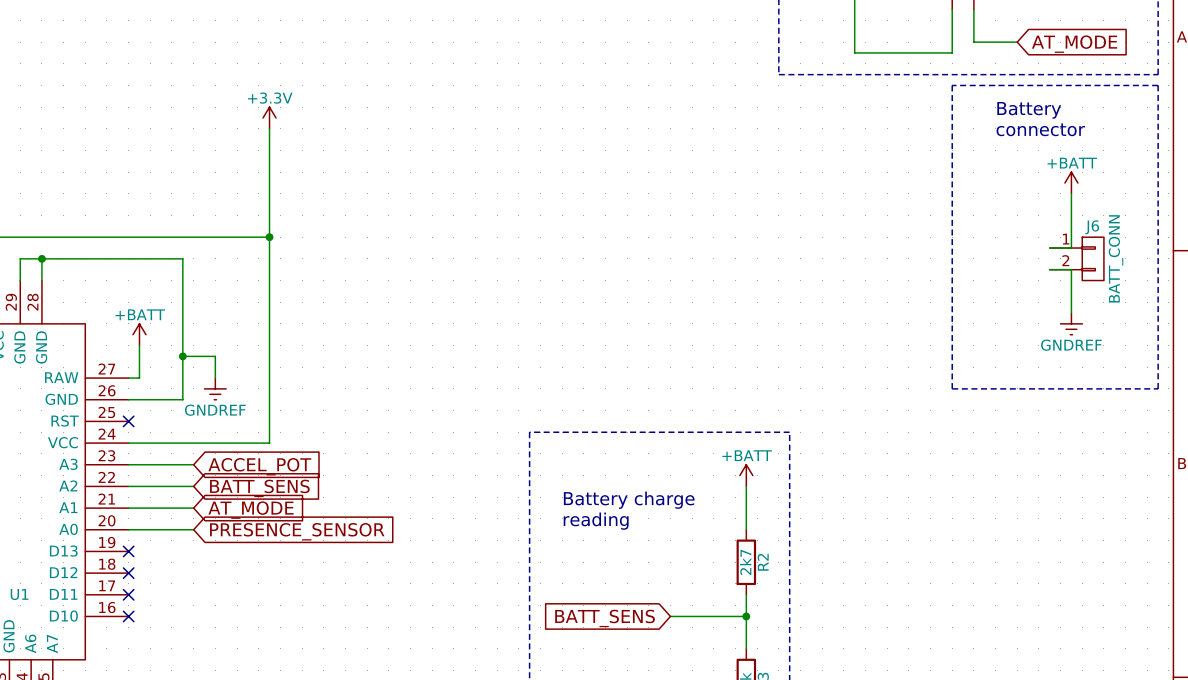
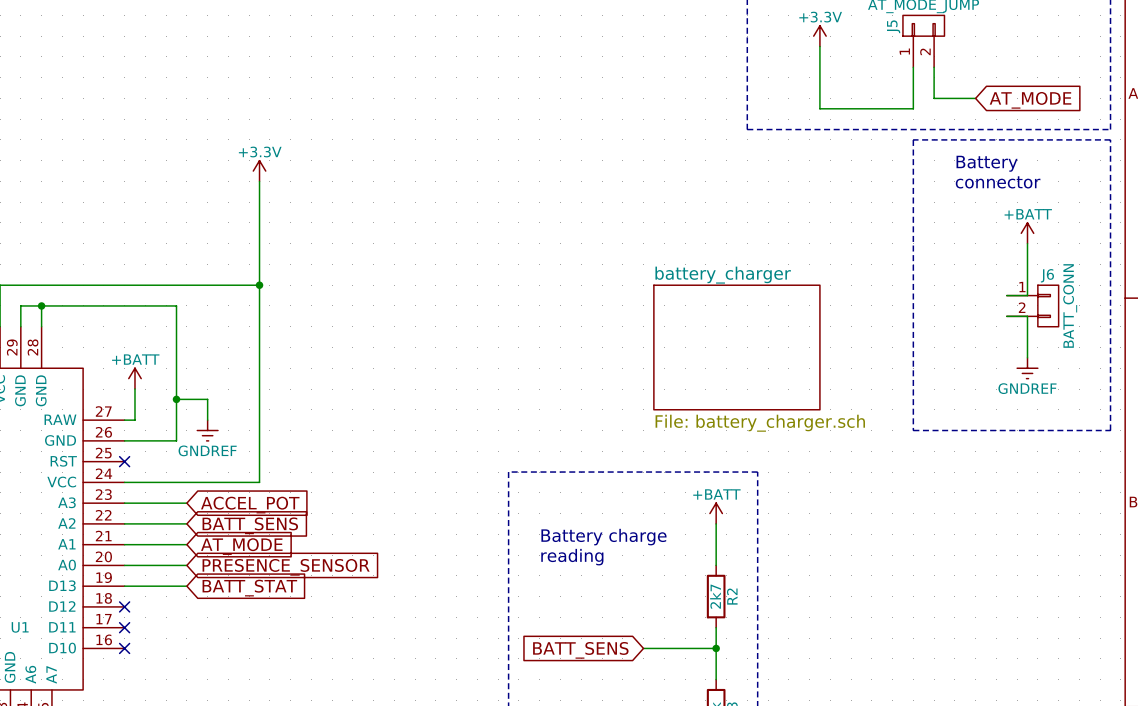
sheet battery_charger: none -> File: battery_charger.sch (736, 347)
wire: none -> (124, 586) (186, 586)
no-connect mark: (128, 551) -> none
global label: none -> BATT_STAT (249, 588)

